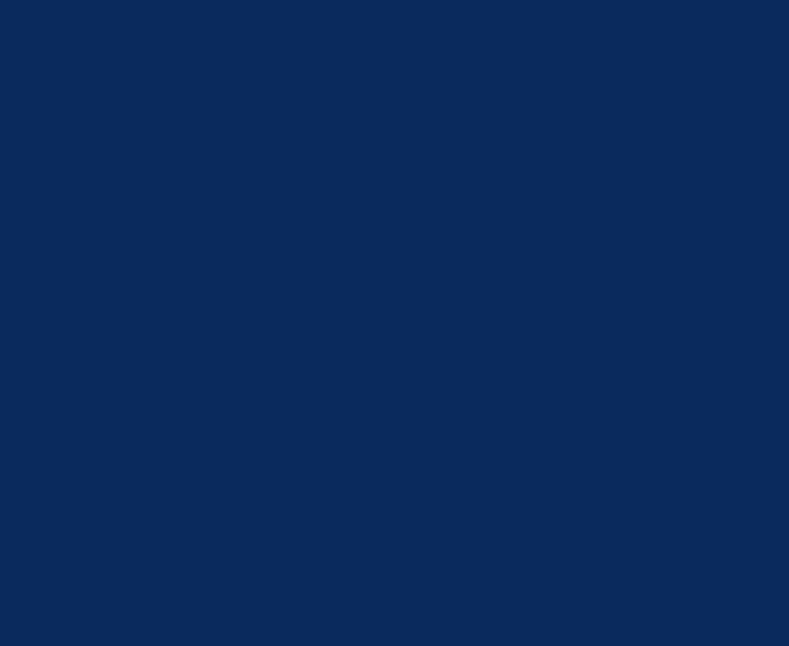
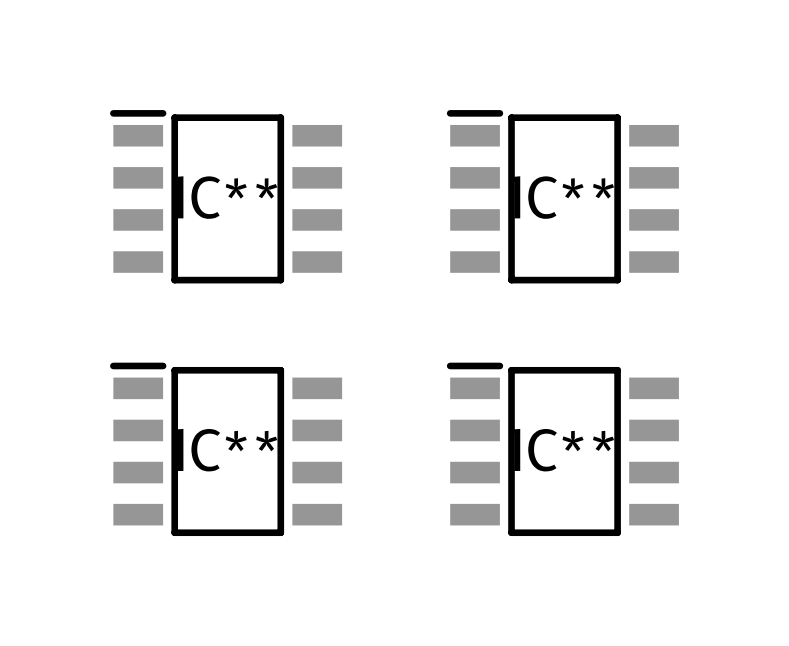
IC**: none -> (226, 196)
IC**: none -> (562, 196)
IC**: none -> (226, 449)
IC**: none -> (562, 449)

